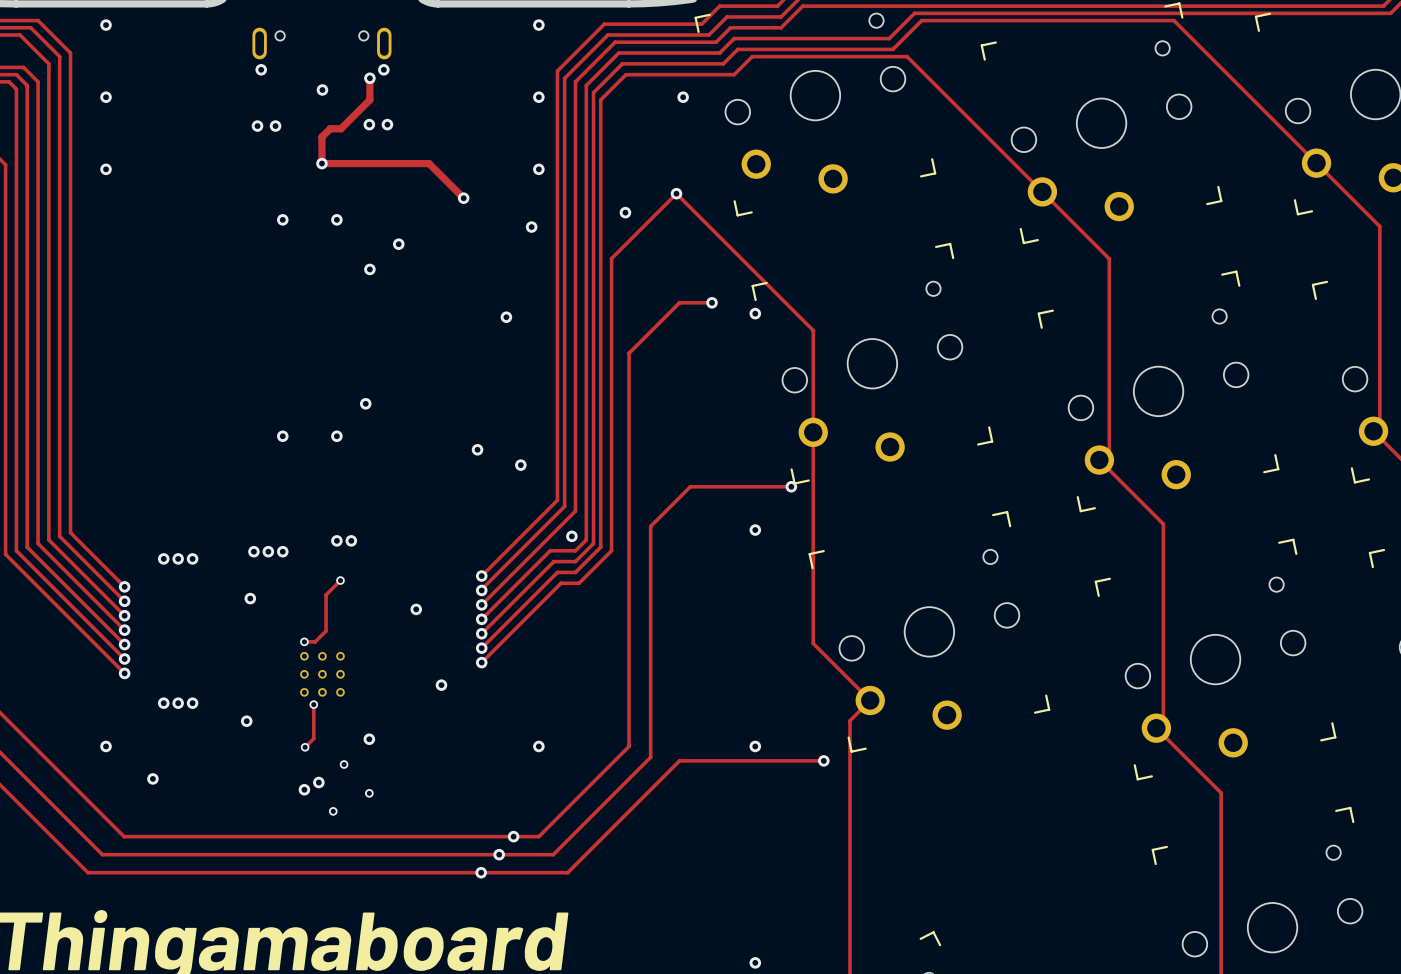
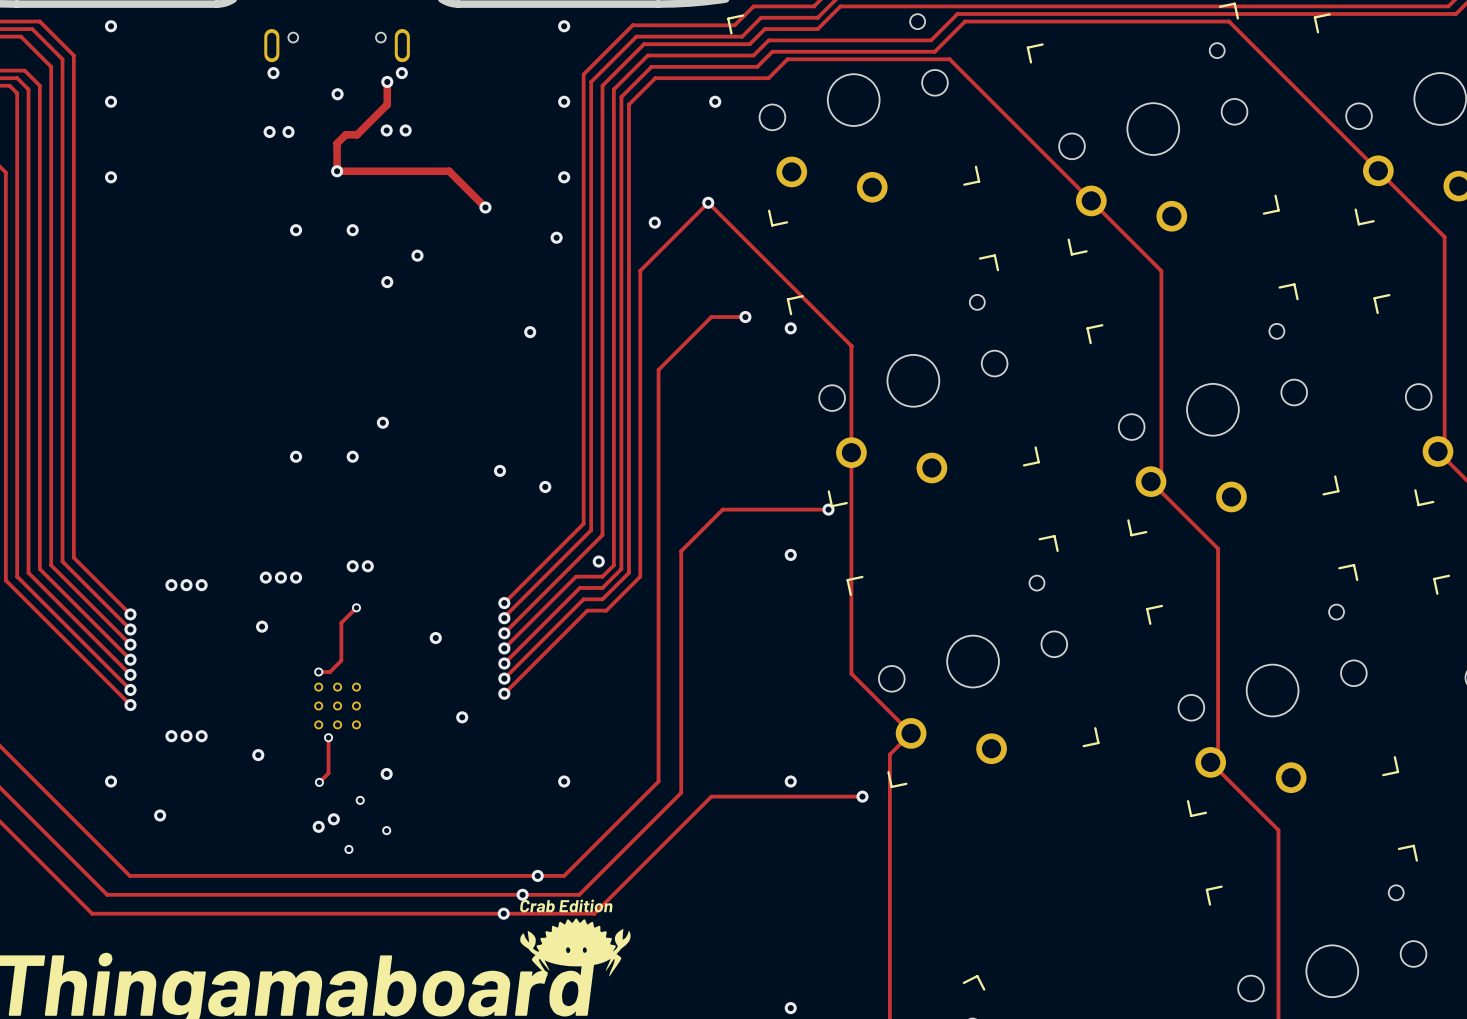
text: none -> Crab Edition (566, 905)
drawing: none -> [520, 918, 631, 977]

